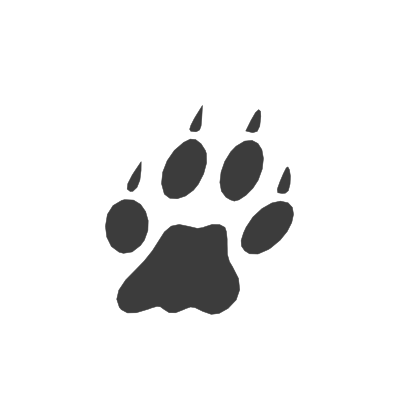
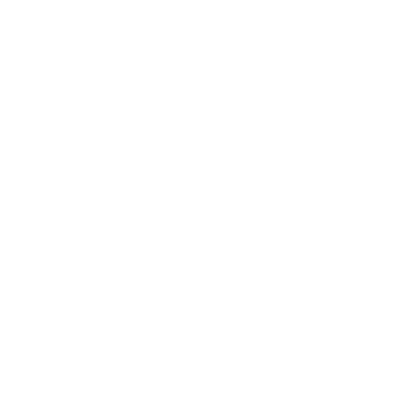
drawing: [105, 105, 294, 315] -> none

